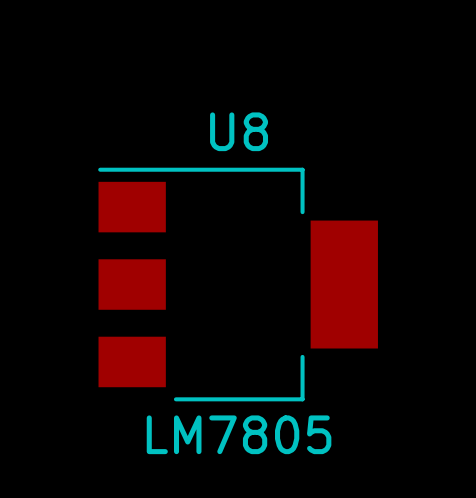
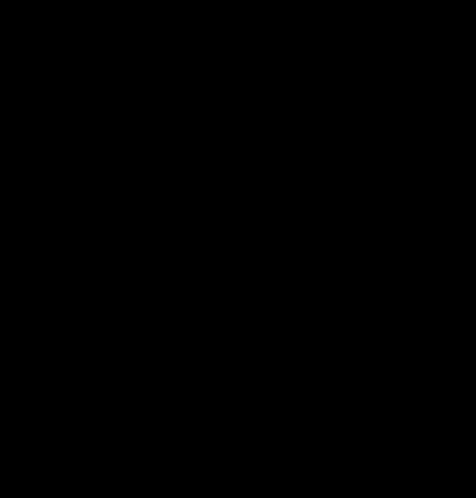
U8: LM7805 (238, 284) -> none

